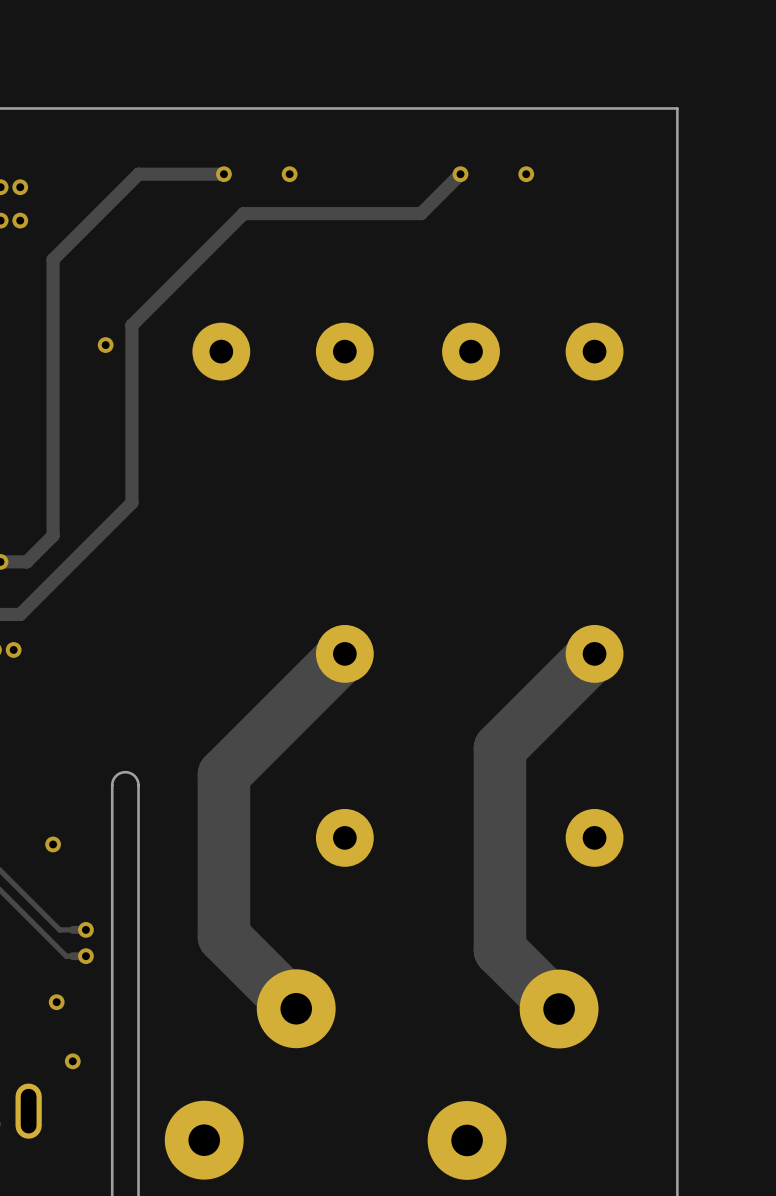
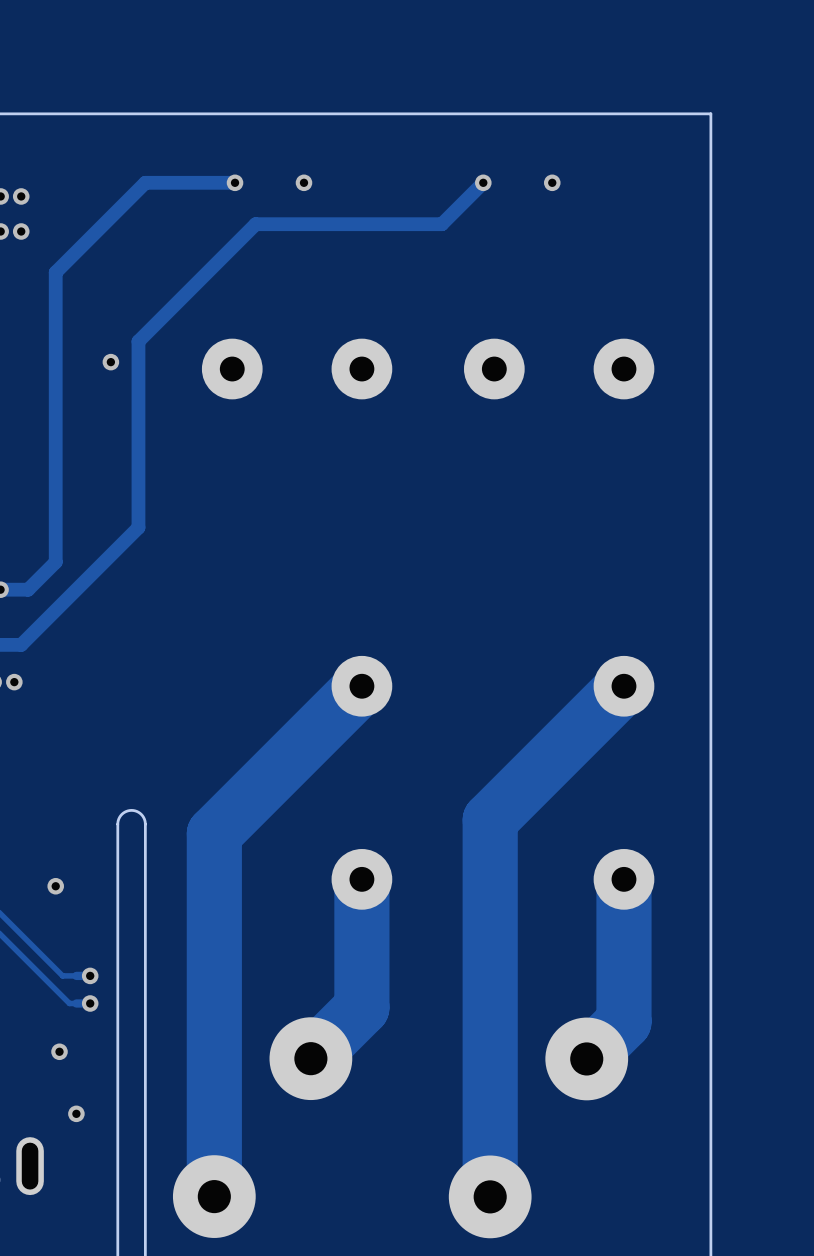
track: (499, 748) (499, 949) (559, 1009) -> (623, 879) (623, 1021) (586, 1058)
track: none -> (524, 785) (490, 820) (490, 1196)
track: (223, 774) (223, 936) (296, 1008) -> (361, 879) (361, 1007) (310, 1058)
track: none -> (235, 813) (214, 833) (214, 1196)

